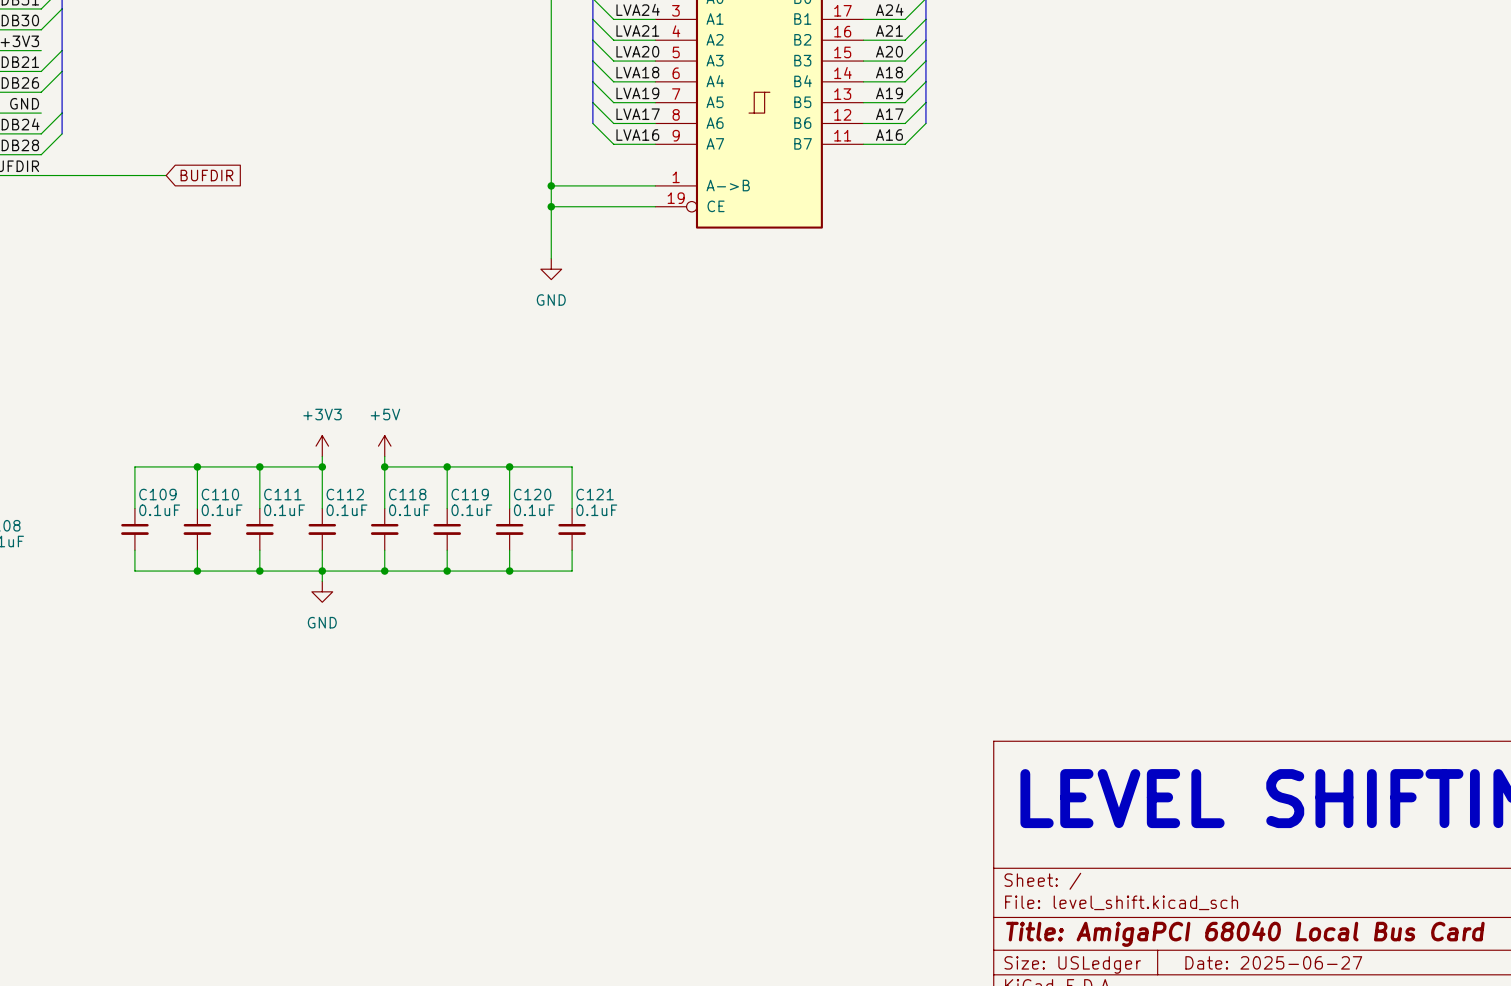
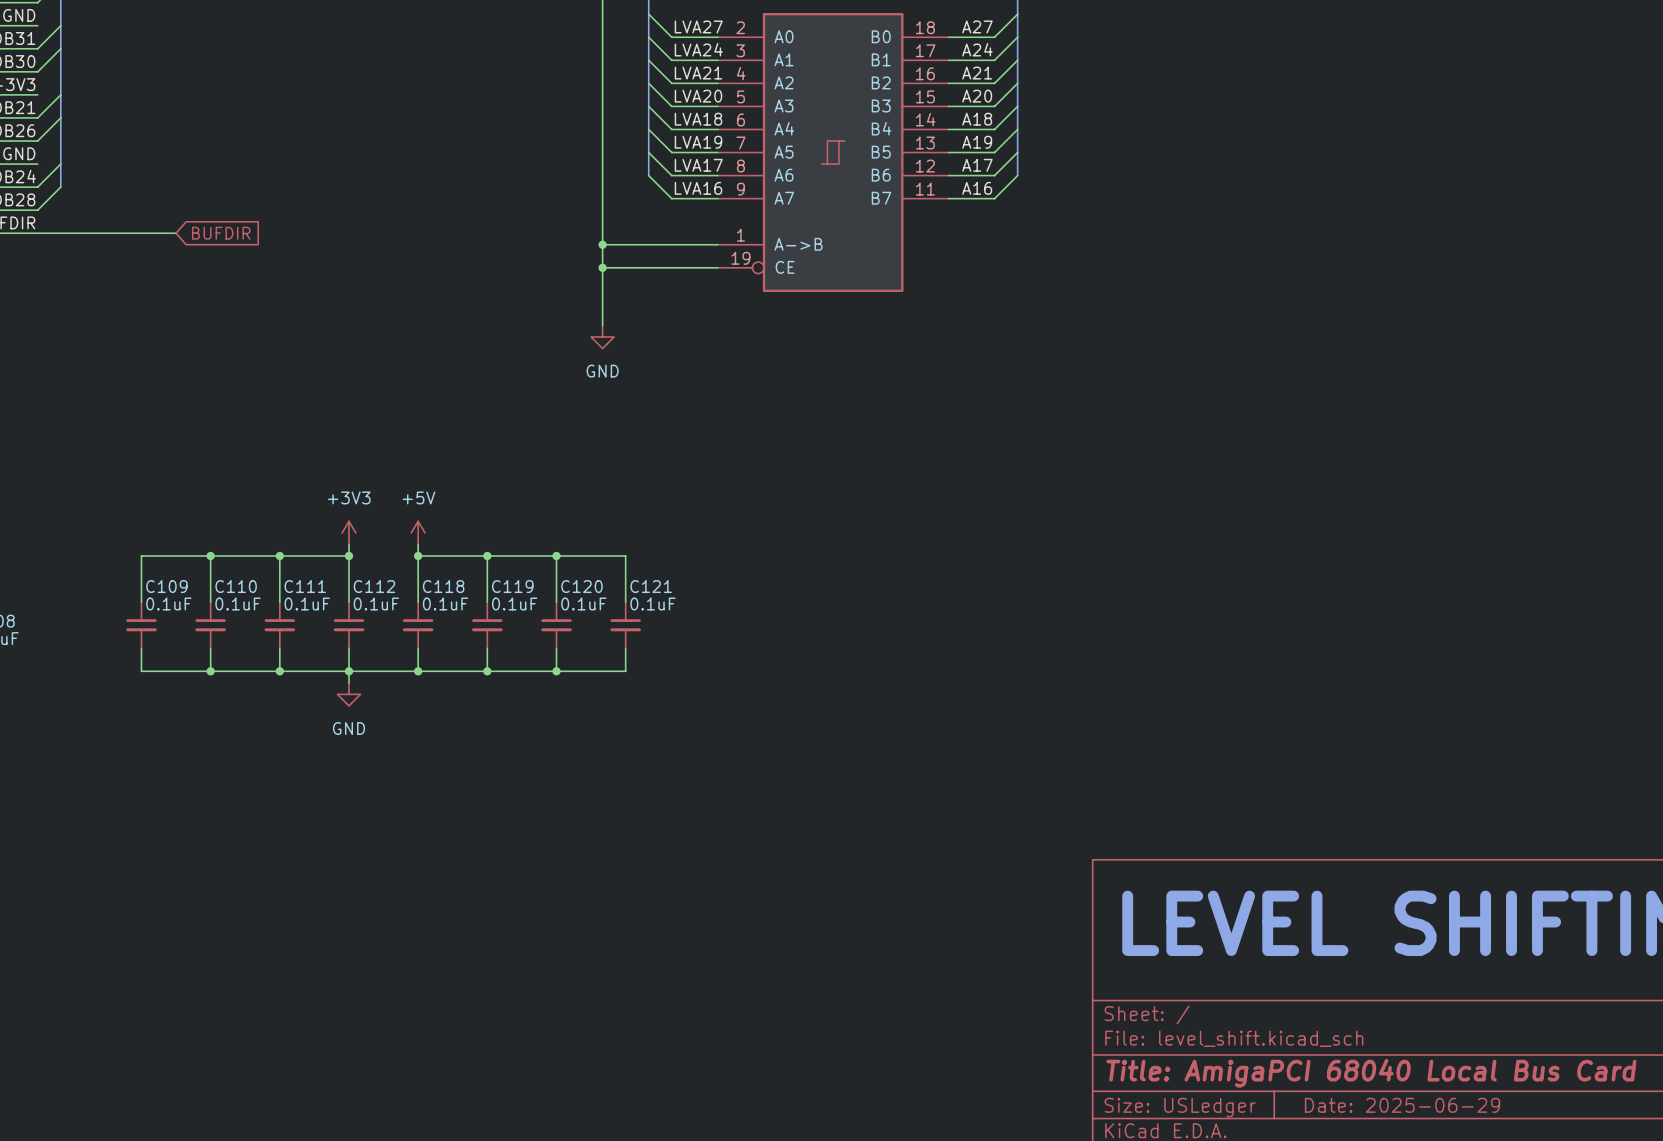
title block: Date: 2025-06-27 (1273, 962) -> Date: 2025-06-29 (1402, 1105)

